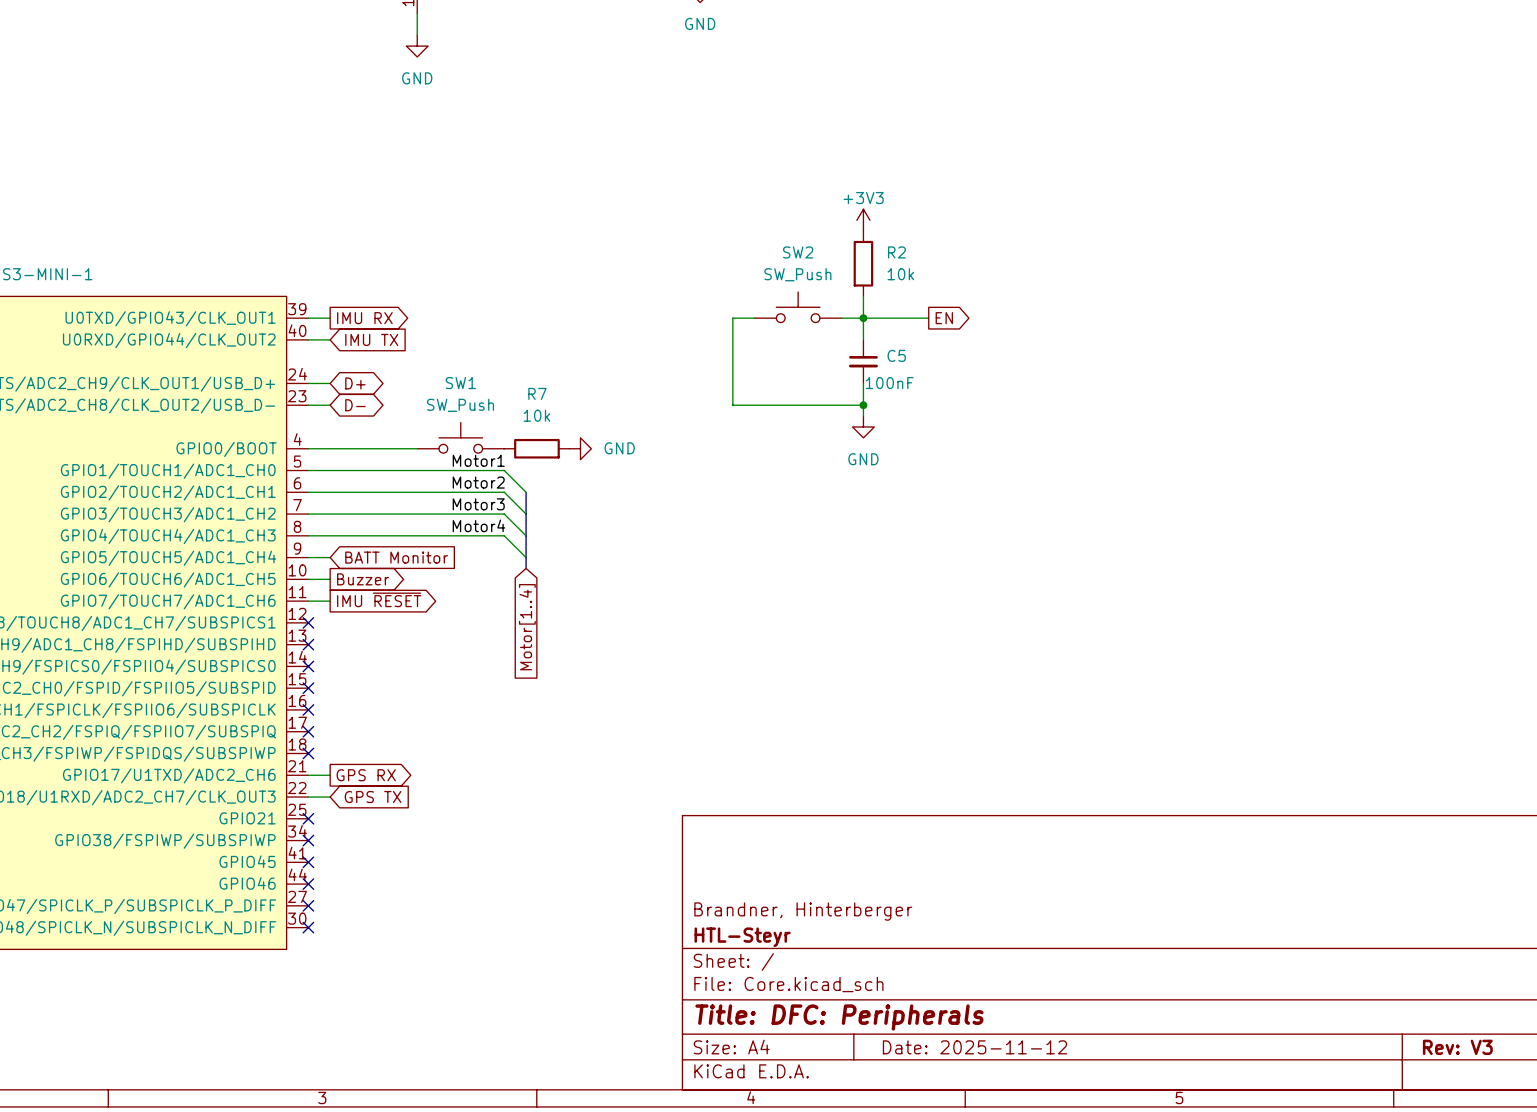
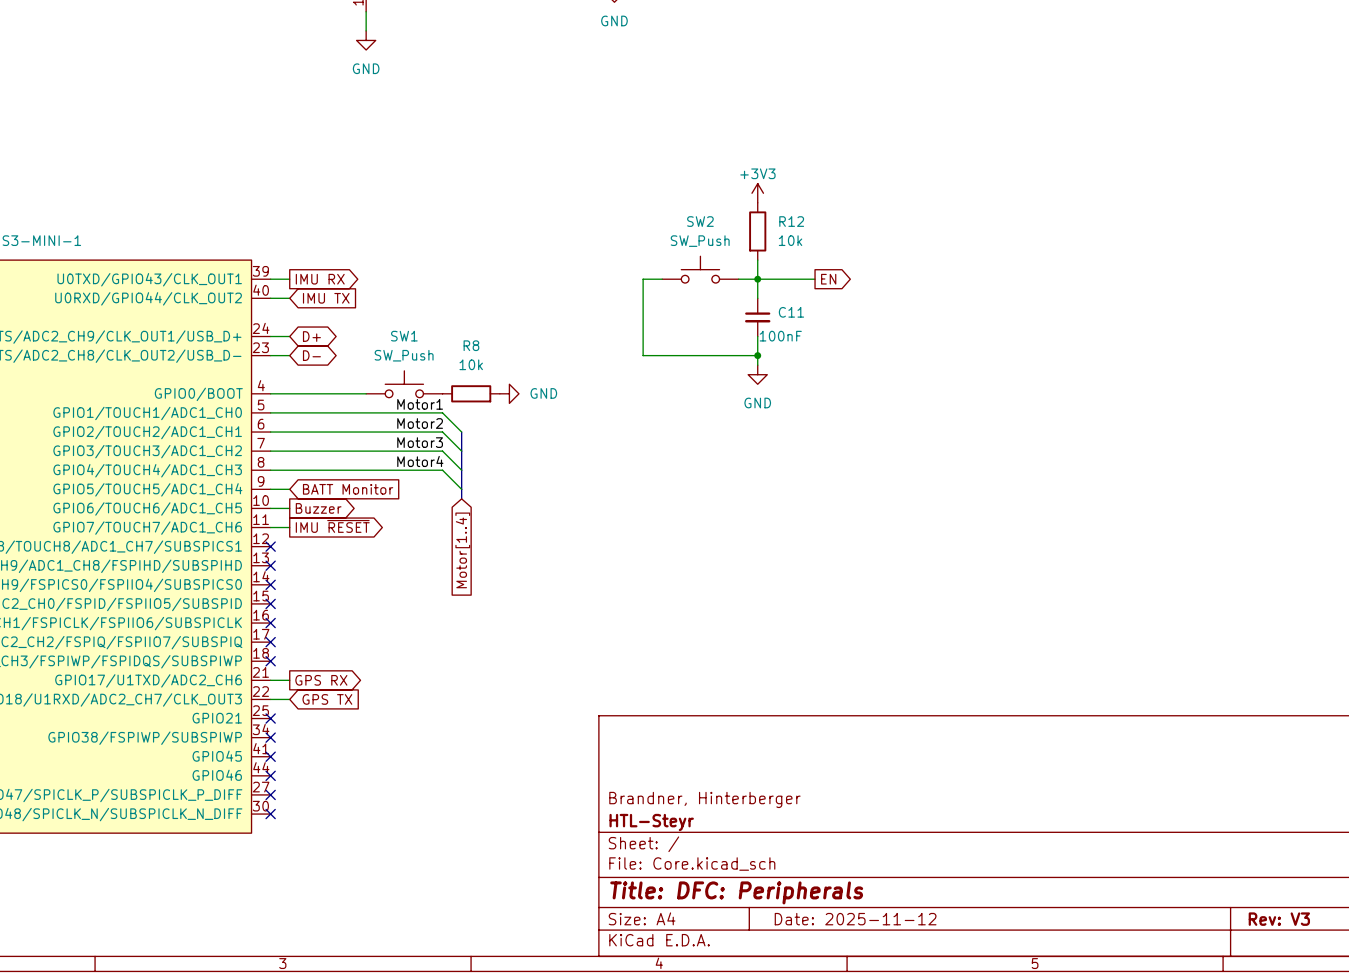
R2 name: R2 (896, 252) -> R12 (791, 221)
C5 name: C5 (896, 355) -> C11 (791, 312)
R7 name: R7 (537, 393) -> R8 (471, 345)

